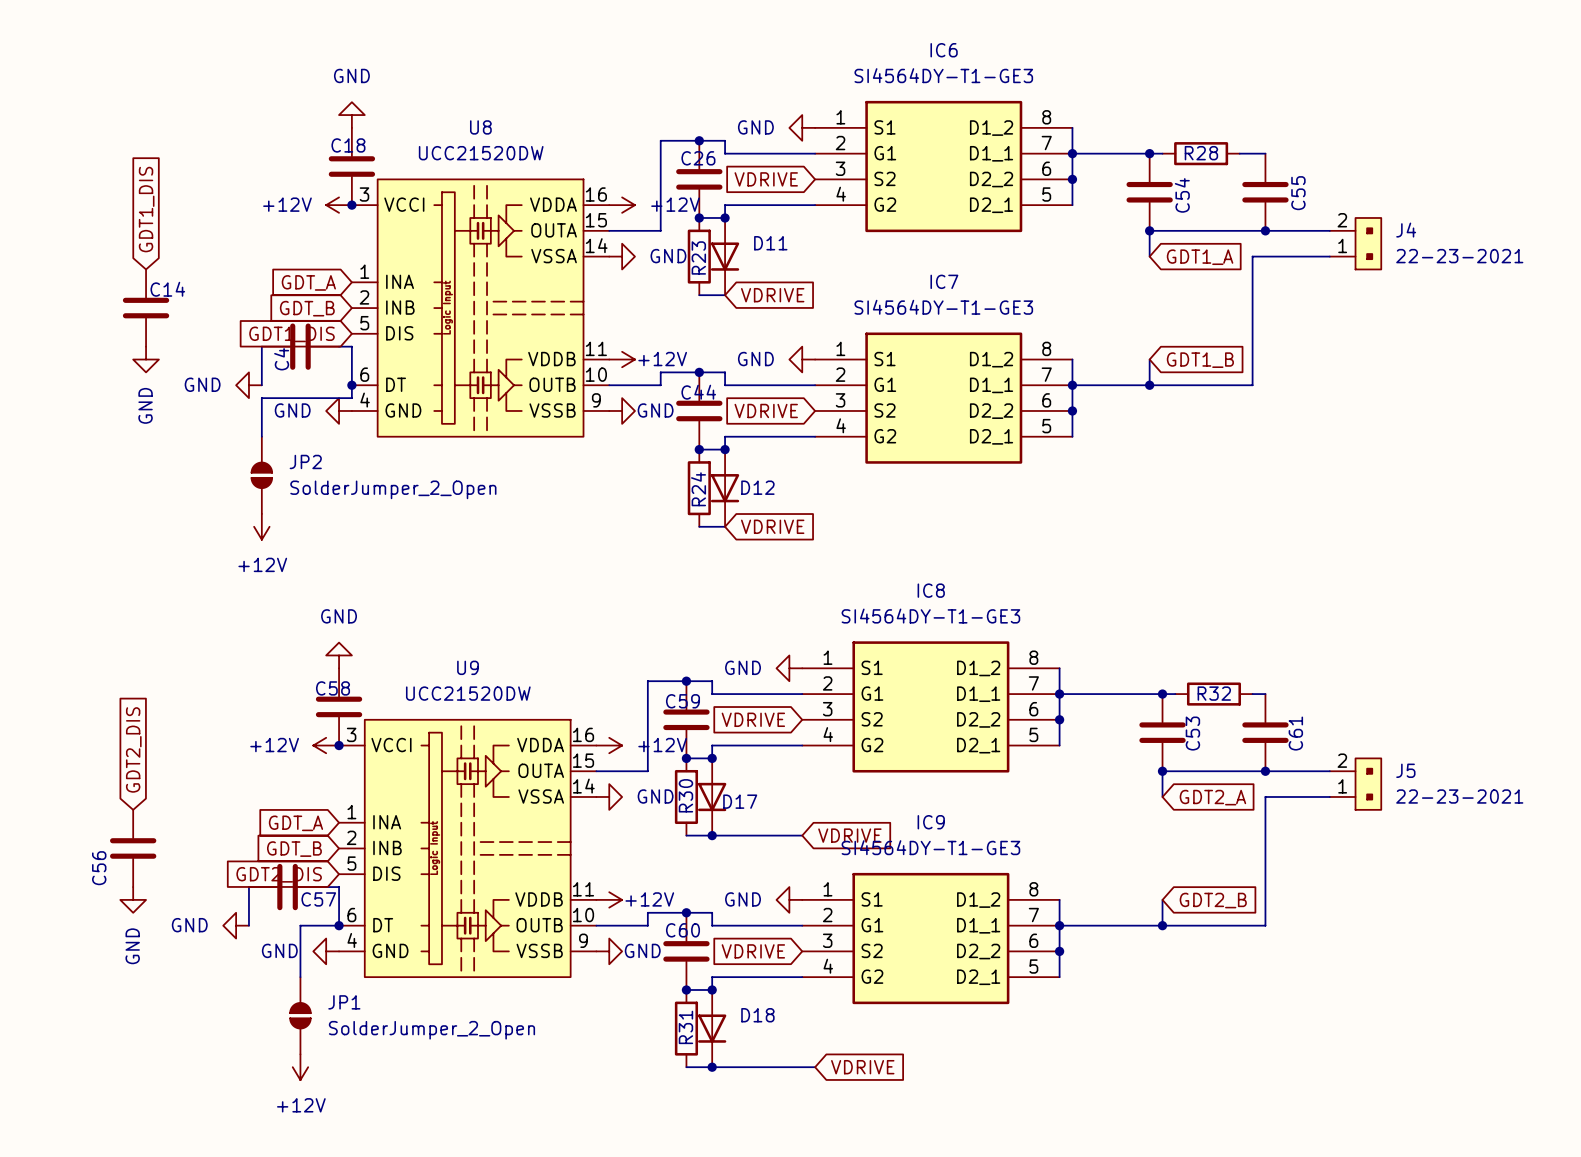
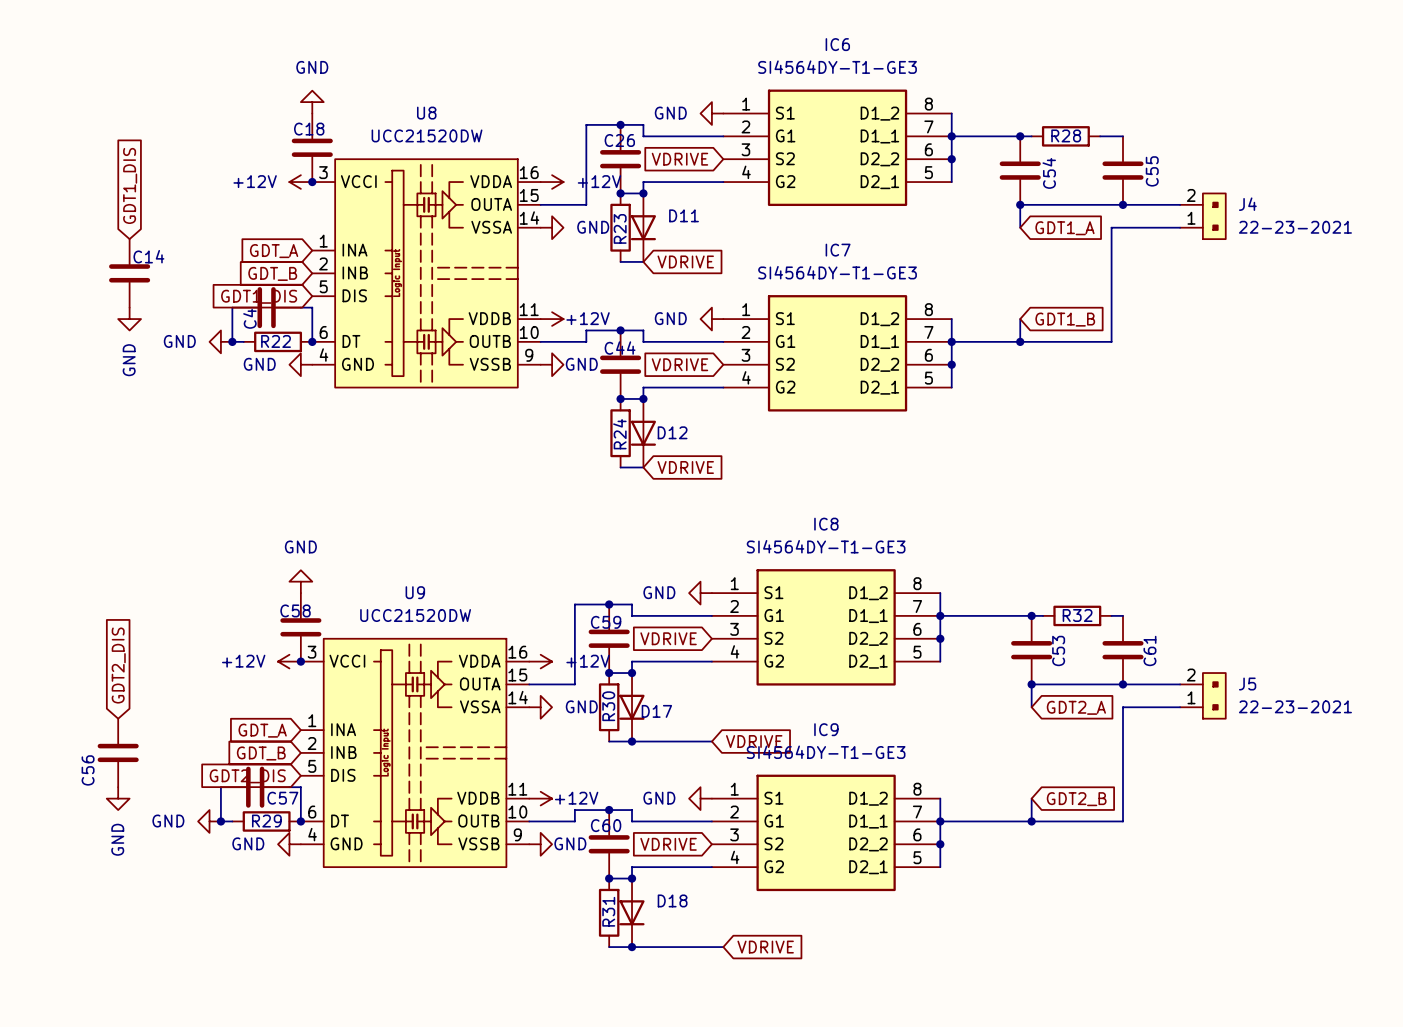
wire: none -> (232, 341) (243, 341)
junction: none -> (232, 341)
R22: none -> (278, 341)
wire: (351, 385) (351, 398) (261, 398) (261, 436) -> none
JP2: SolderJumper_2_Open (261, 475) -> none
power symbol: +12V (261, 526) -> none
wire: none -> (220, 821) (232, 821)
junction: none -> (220, 821)
R29: none -> (266, 821)
wire: (339, 925) (300, 925) (300, 977) -> none
JP1: SolderJumper_2_Open (300, 1015) -> none
power symbol: +12V (300, 1067) -> none

